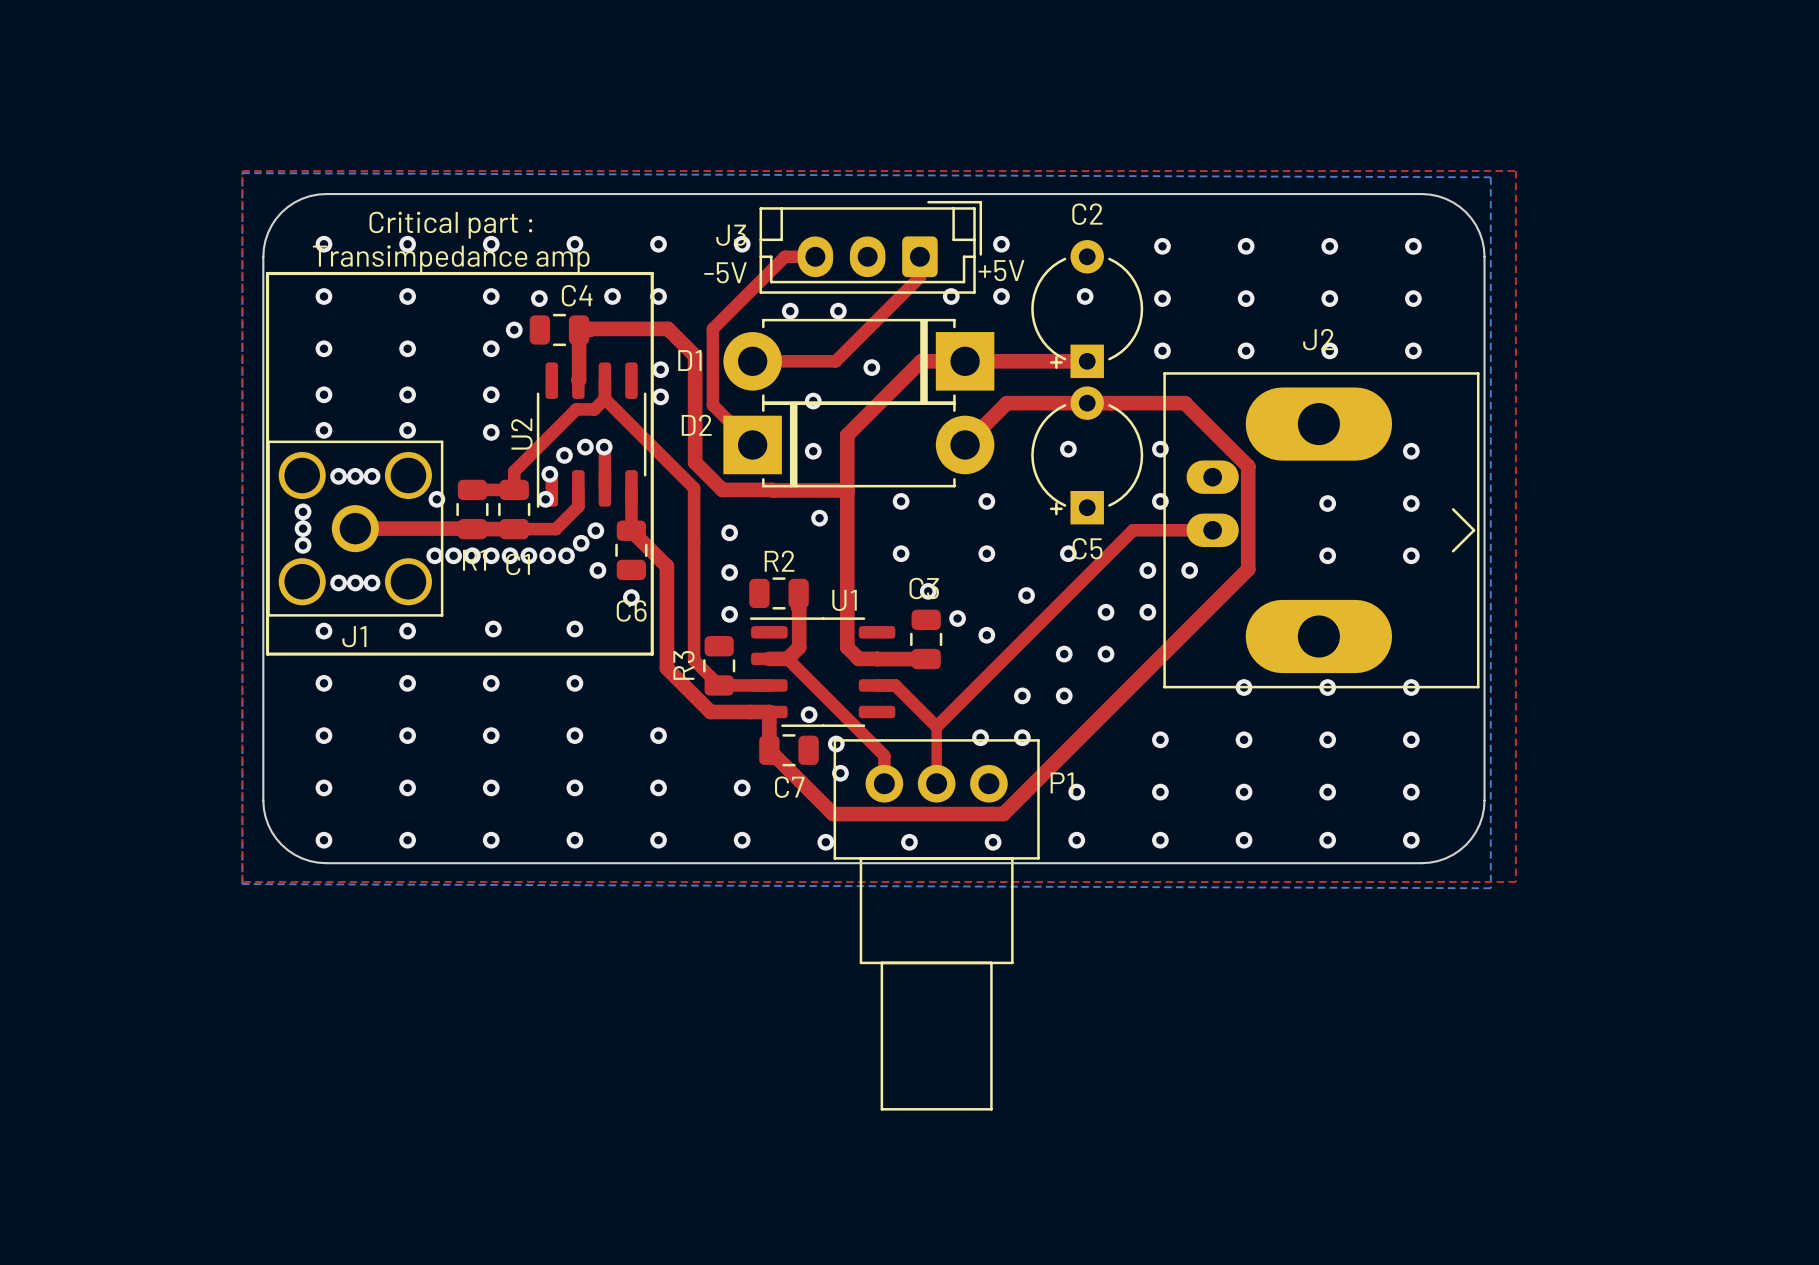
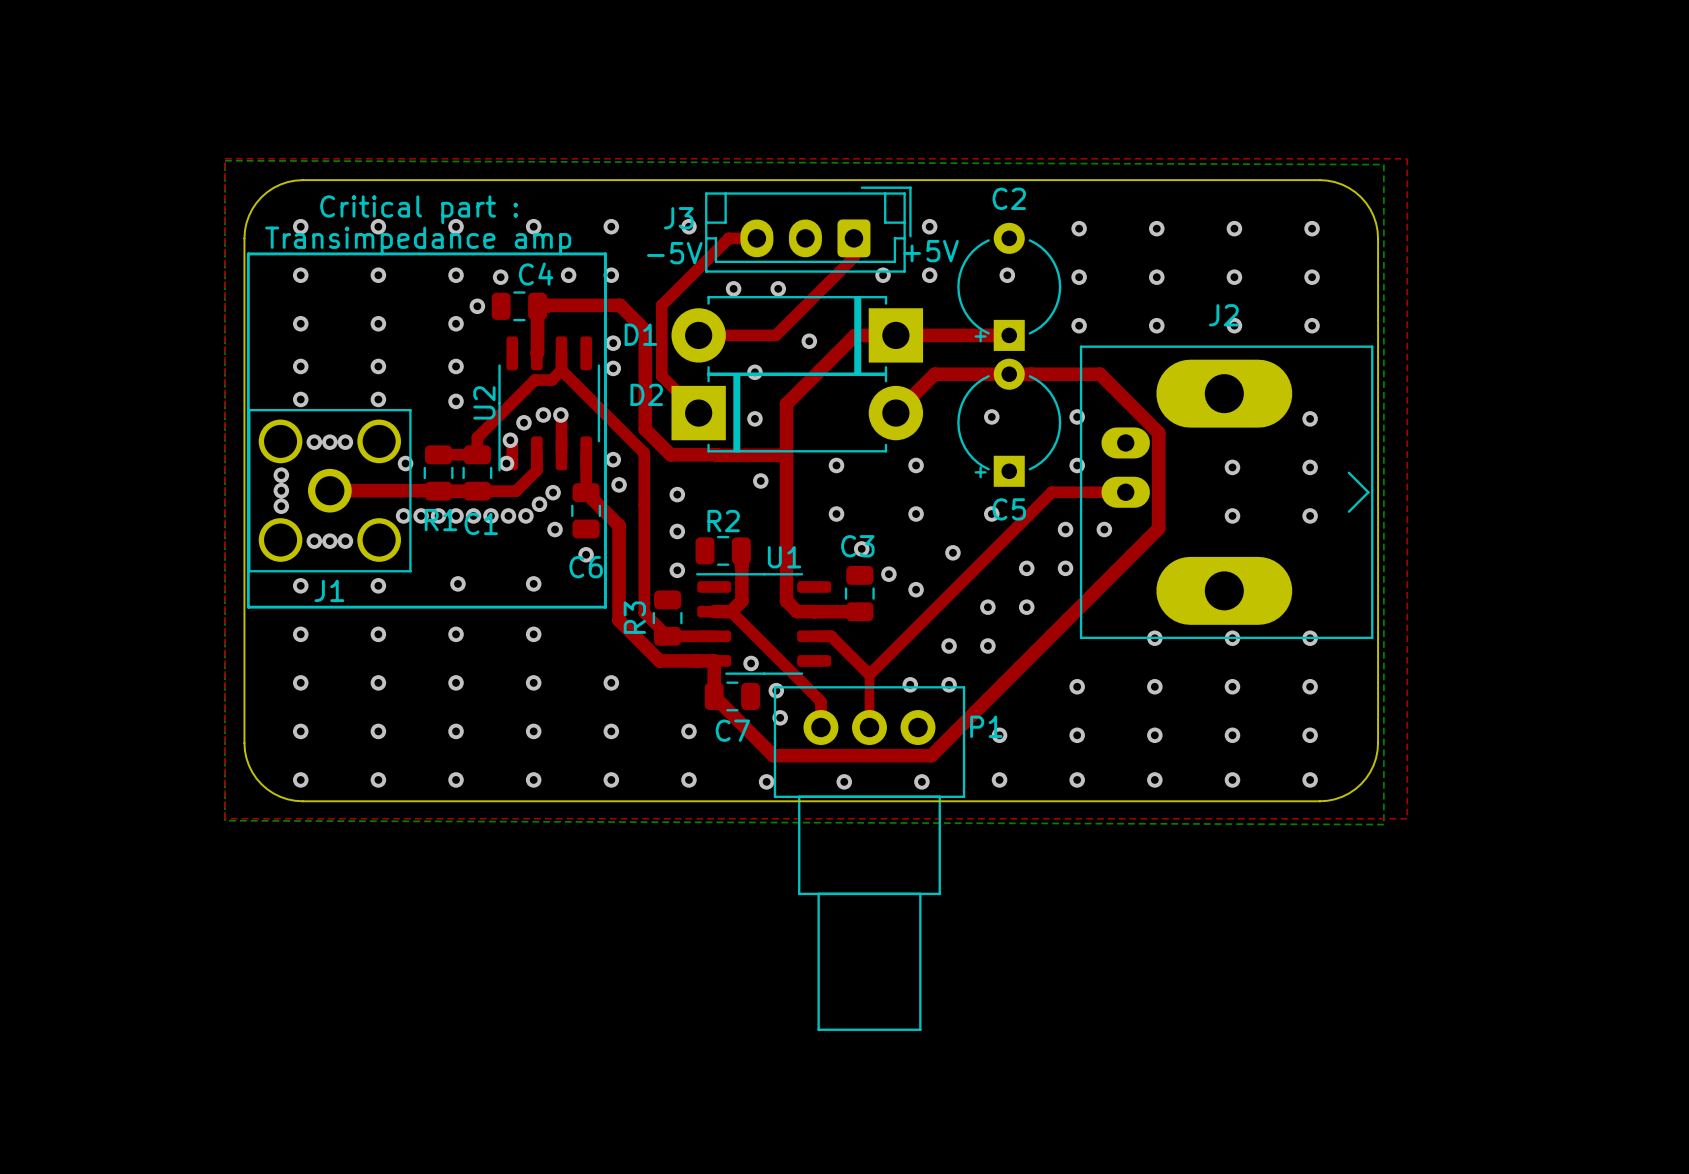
via: none -> (613, 459)
via: none -> (619, 484)

